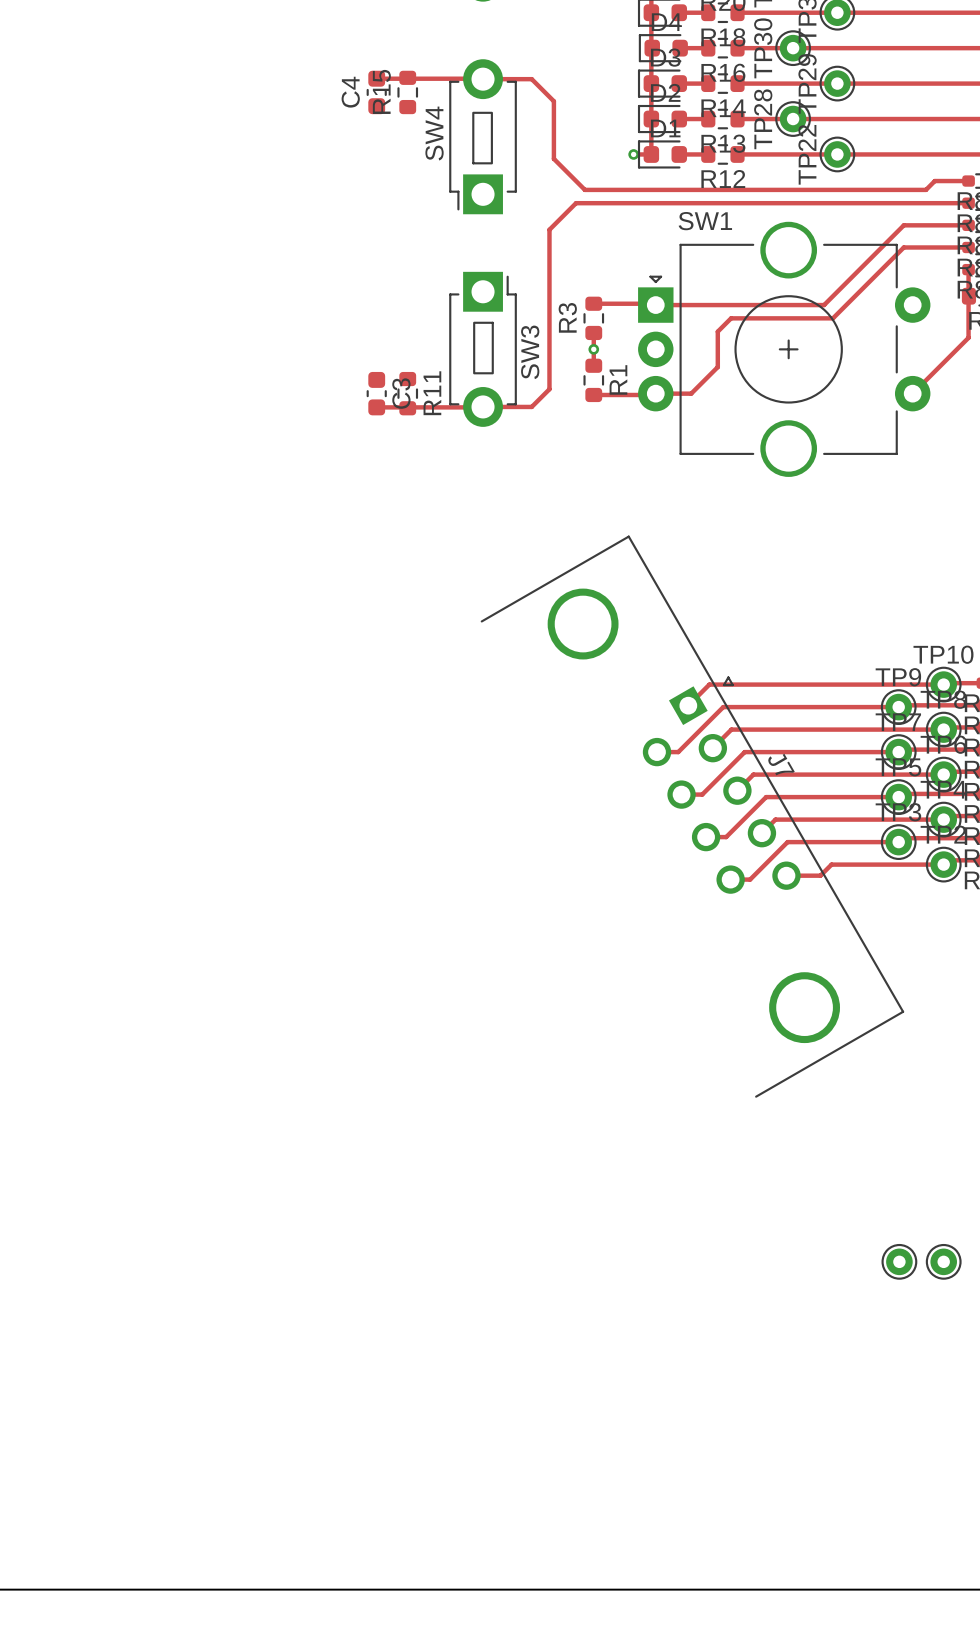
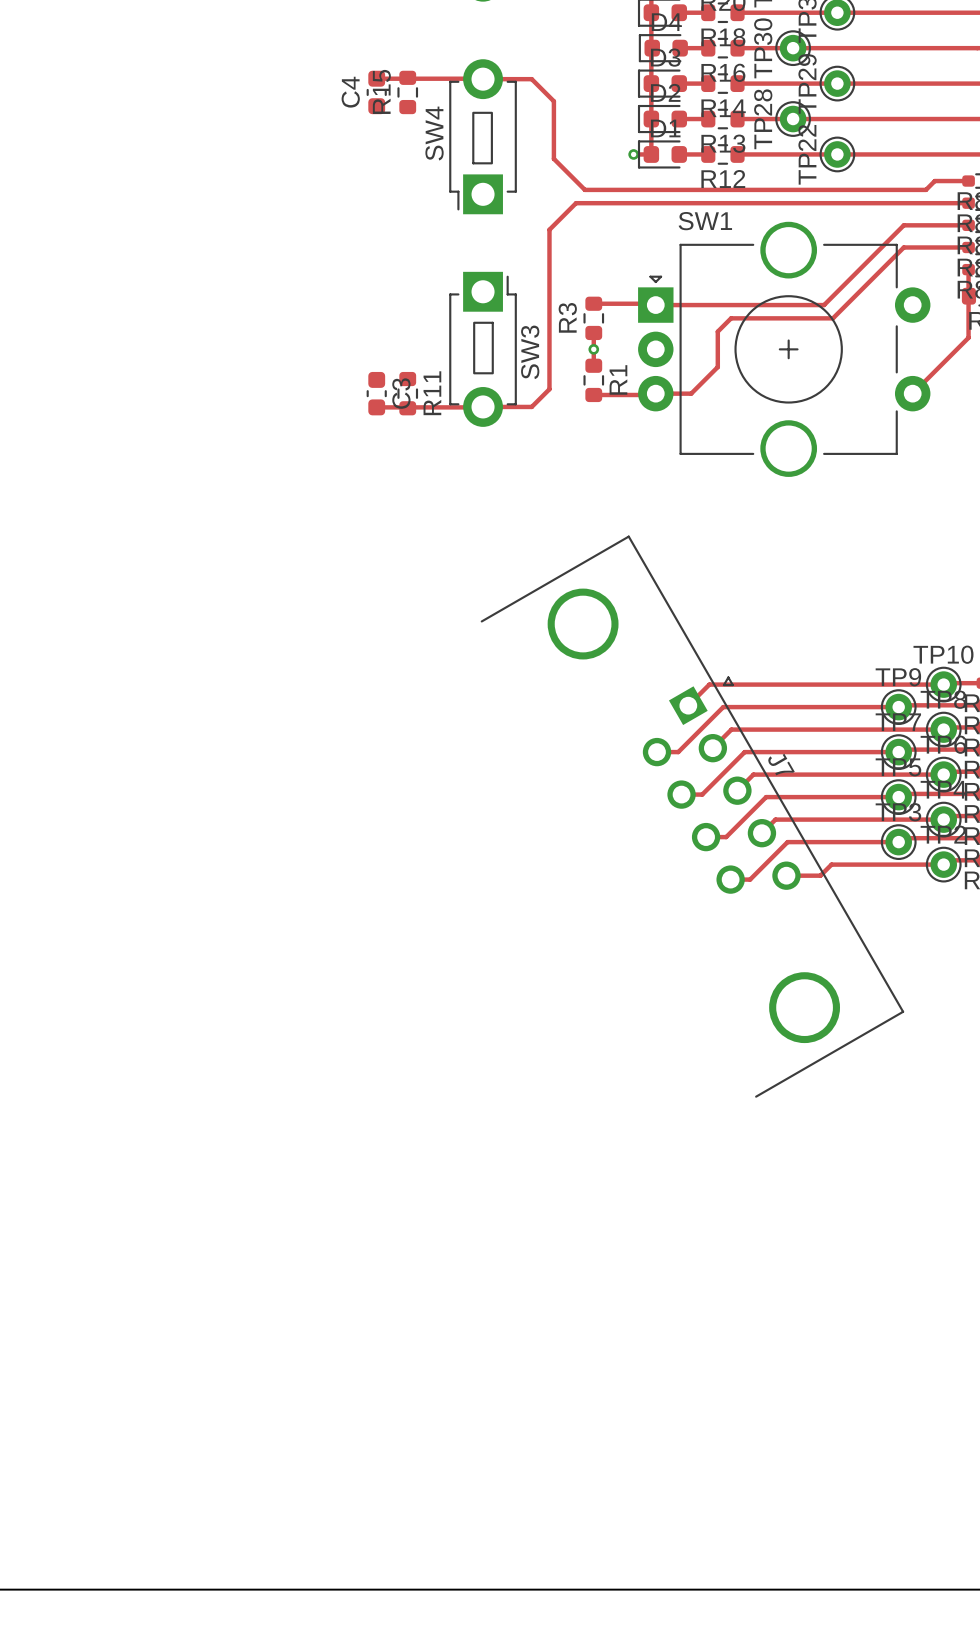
part: (899, 1261) -> none
part: (943, 1261) -> none

